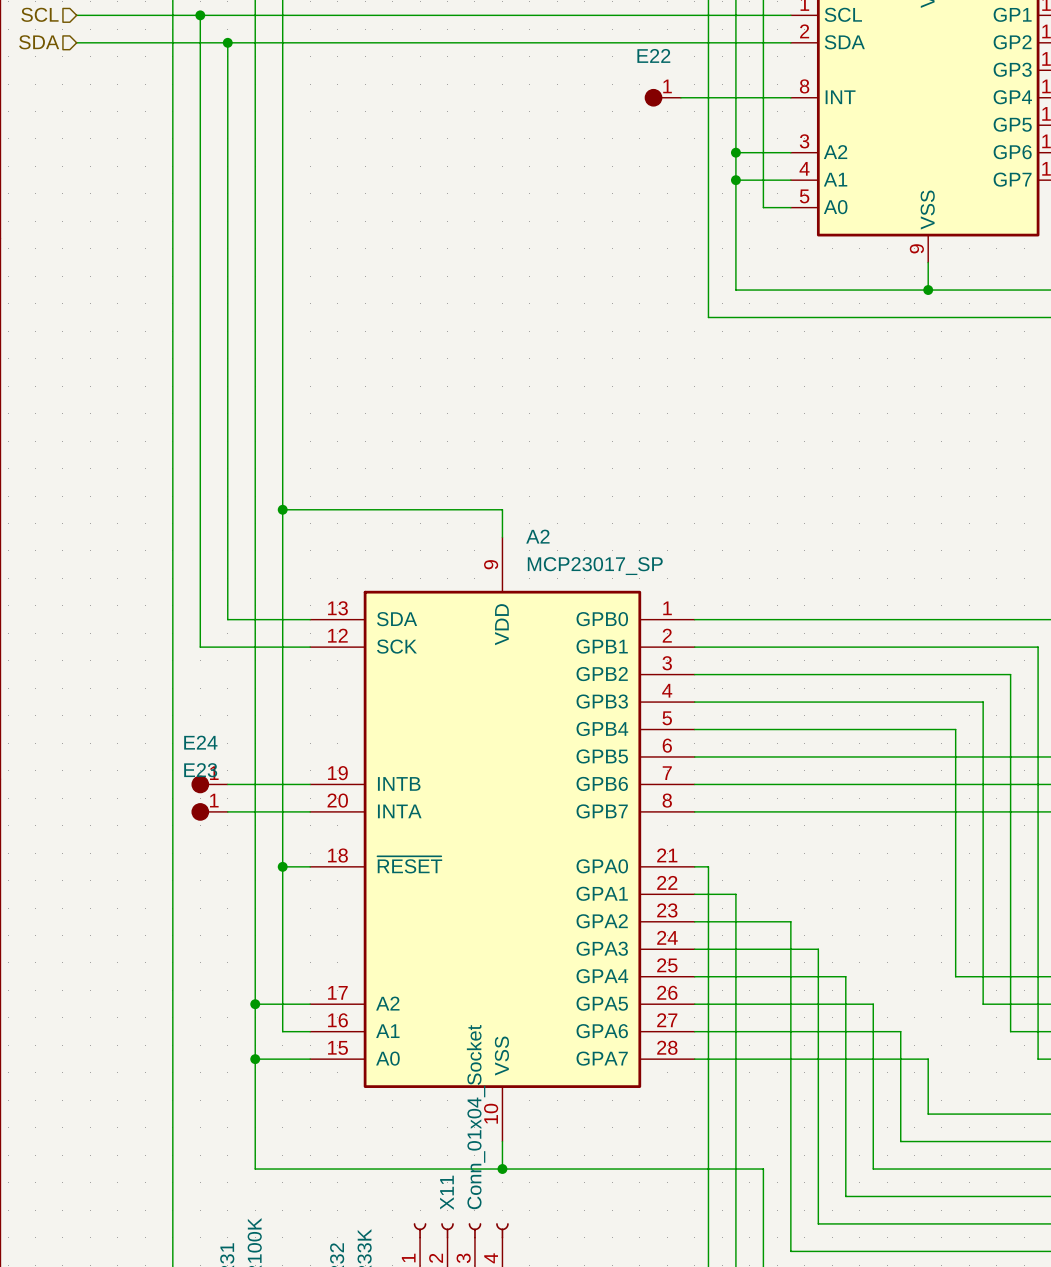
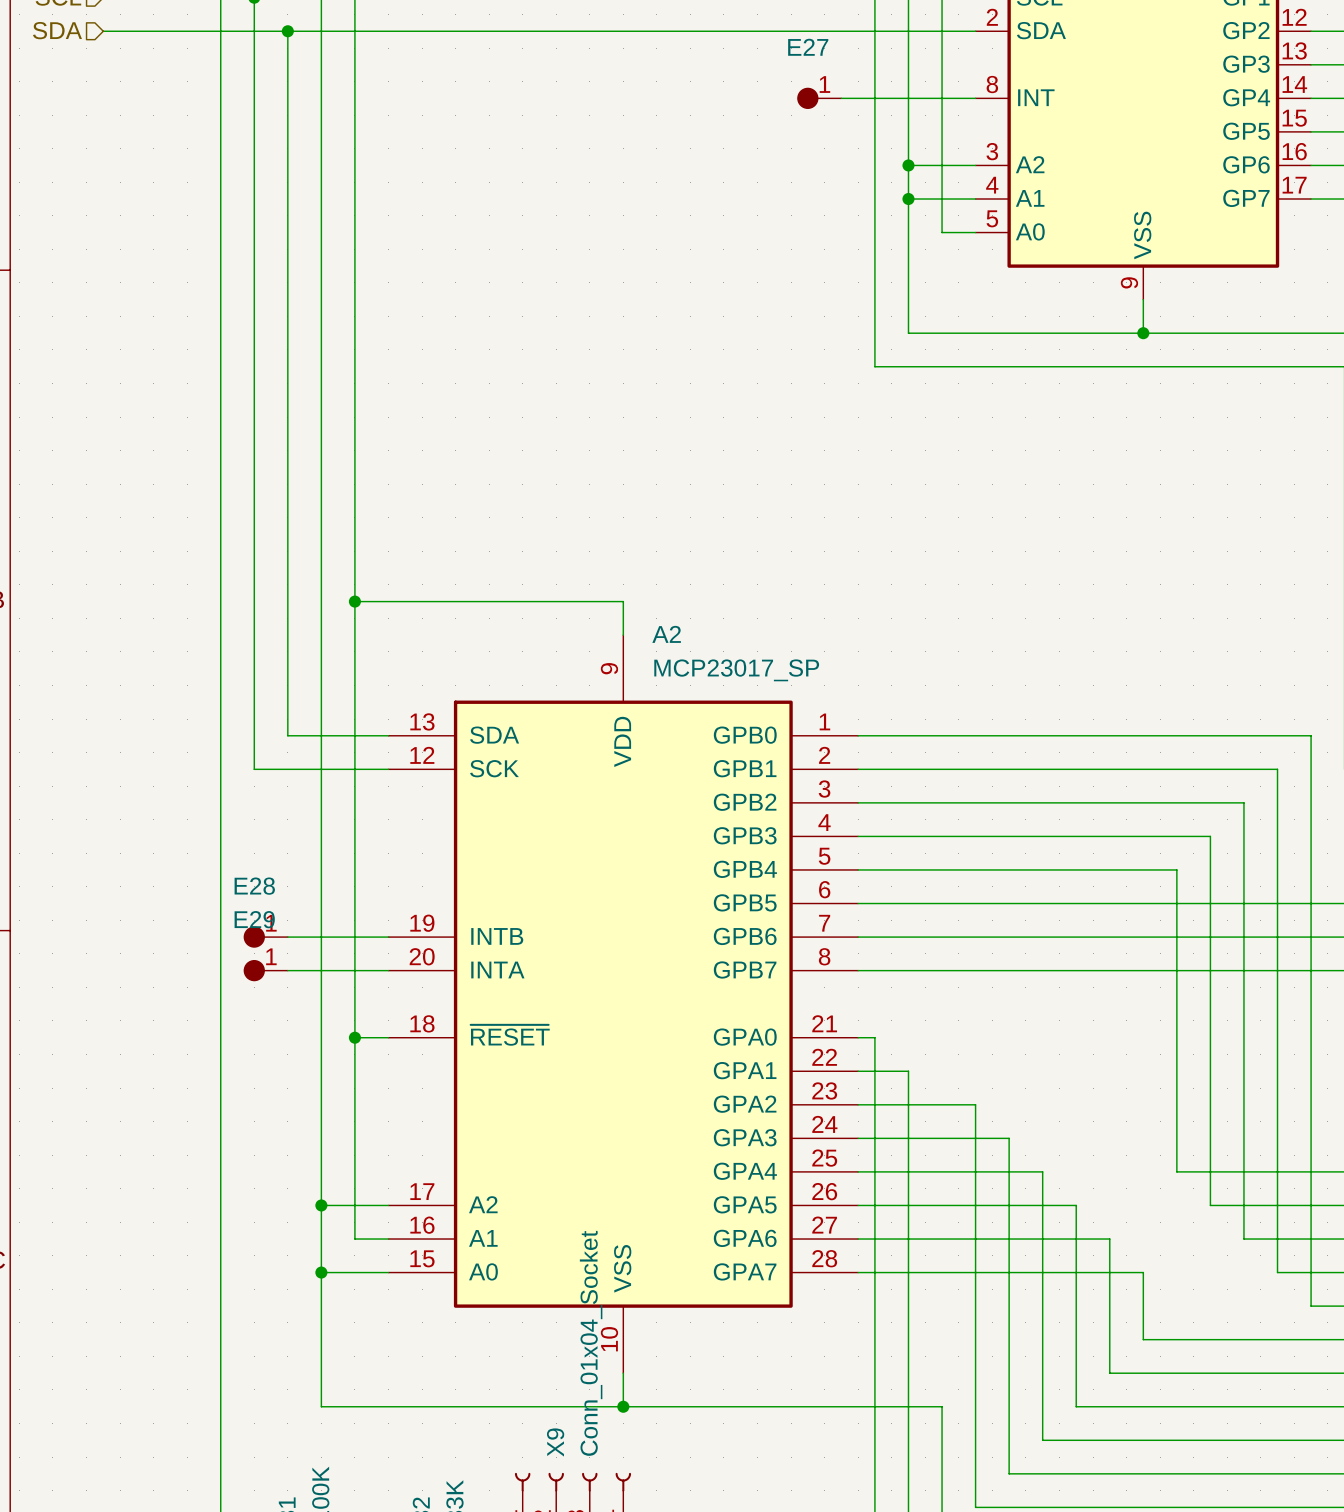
E22 name: E22 (653, 55) -> E27 (808, 47)
E24 name: E24 (200, 742) -> E28 (254, 886)
E23 name: E23 (200, 770) -> E29 (254, 919)
X11 name: X11 (446, 1192) -> X9 (555, 1442)

